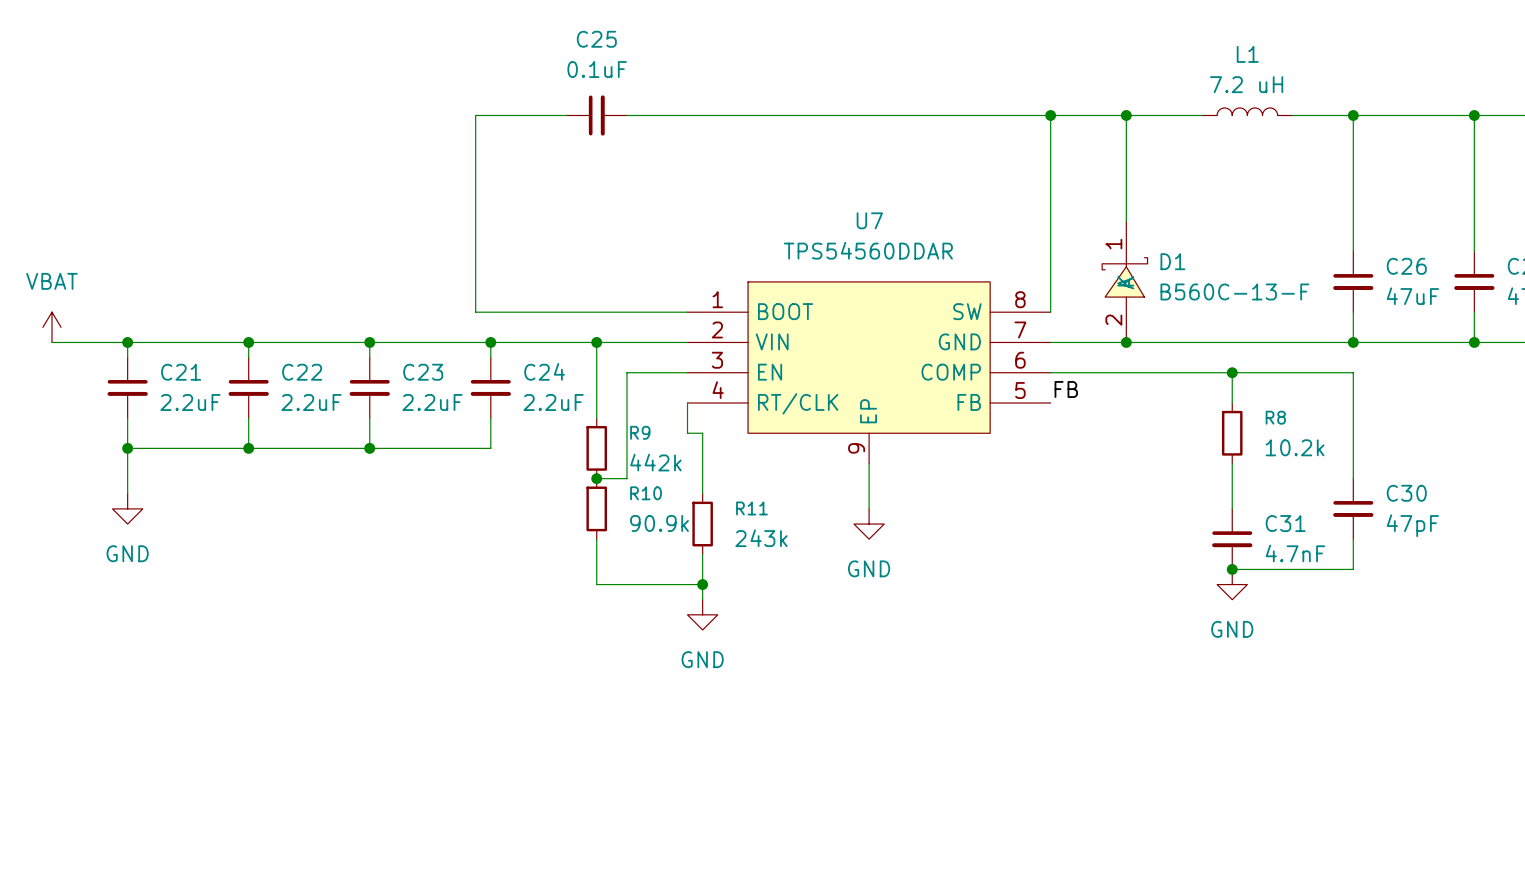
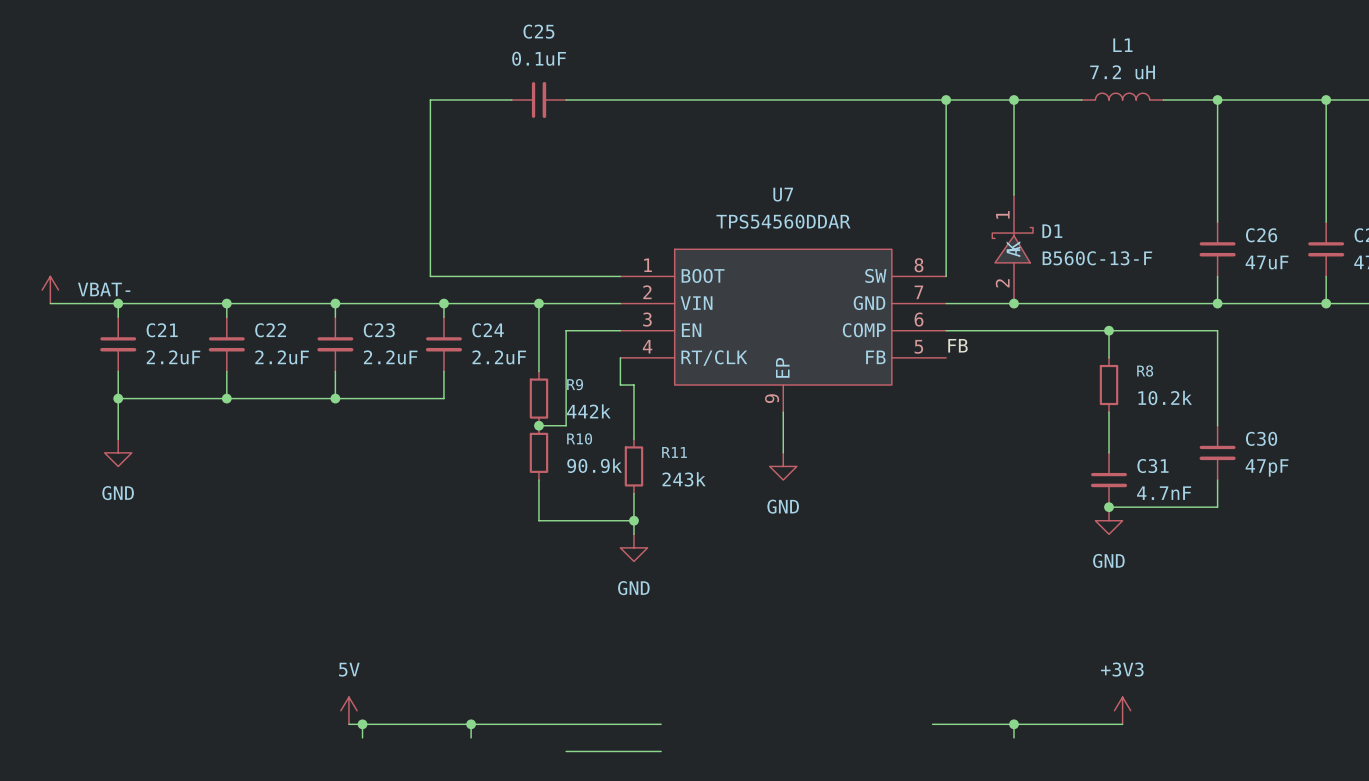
power symbol: VBAT (51, 327) -> VBAT- (50, 290)
power symbol: none -> 5V (348, 710)
power symbol: none -> +3V3 (1122, 710)
wire: none -> (348, 724) (661, 724)
wire: none -> (362, 724) (362, 737)
junction: none -> (362, 724)
wire: none -> (471, 724) (471, 737)
junction: none -> (471, 724)
wire: none -> (932, 724) (1122, 724)
wire: none -> (1014, 724) (1014, 737)
junction: none -> (1014, 724)
wire: none -> (566, 751) (661, 751)

